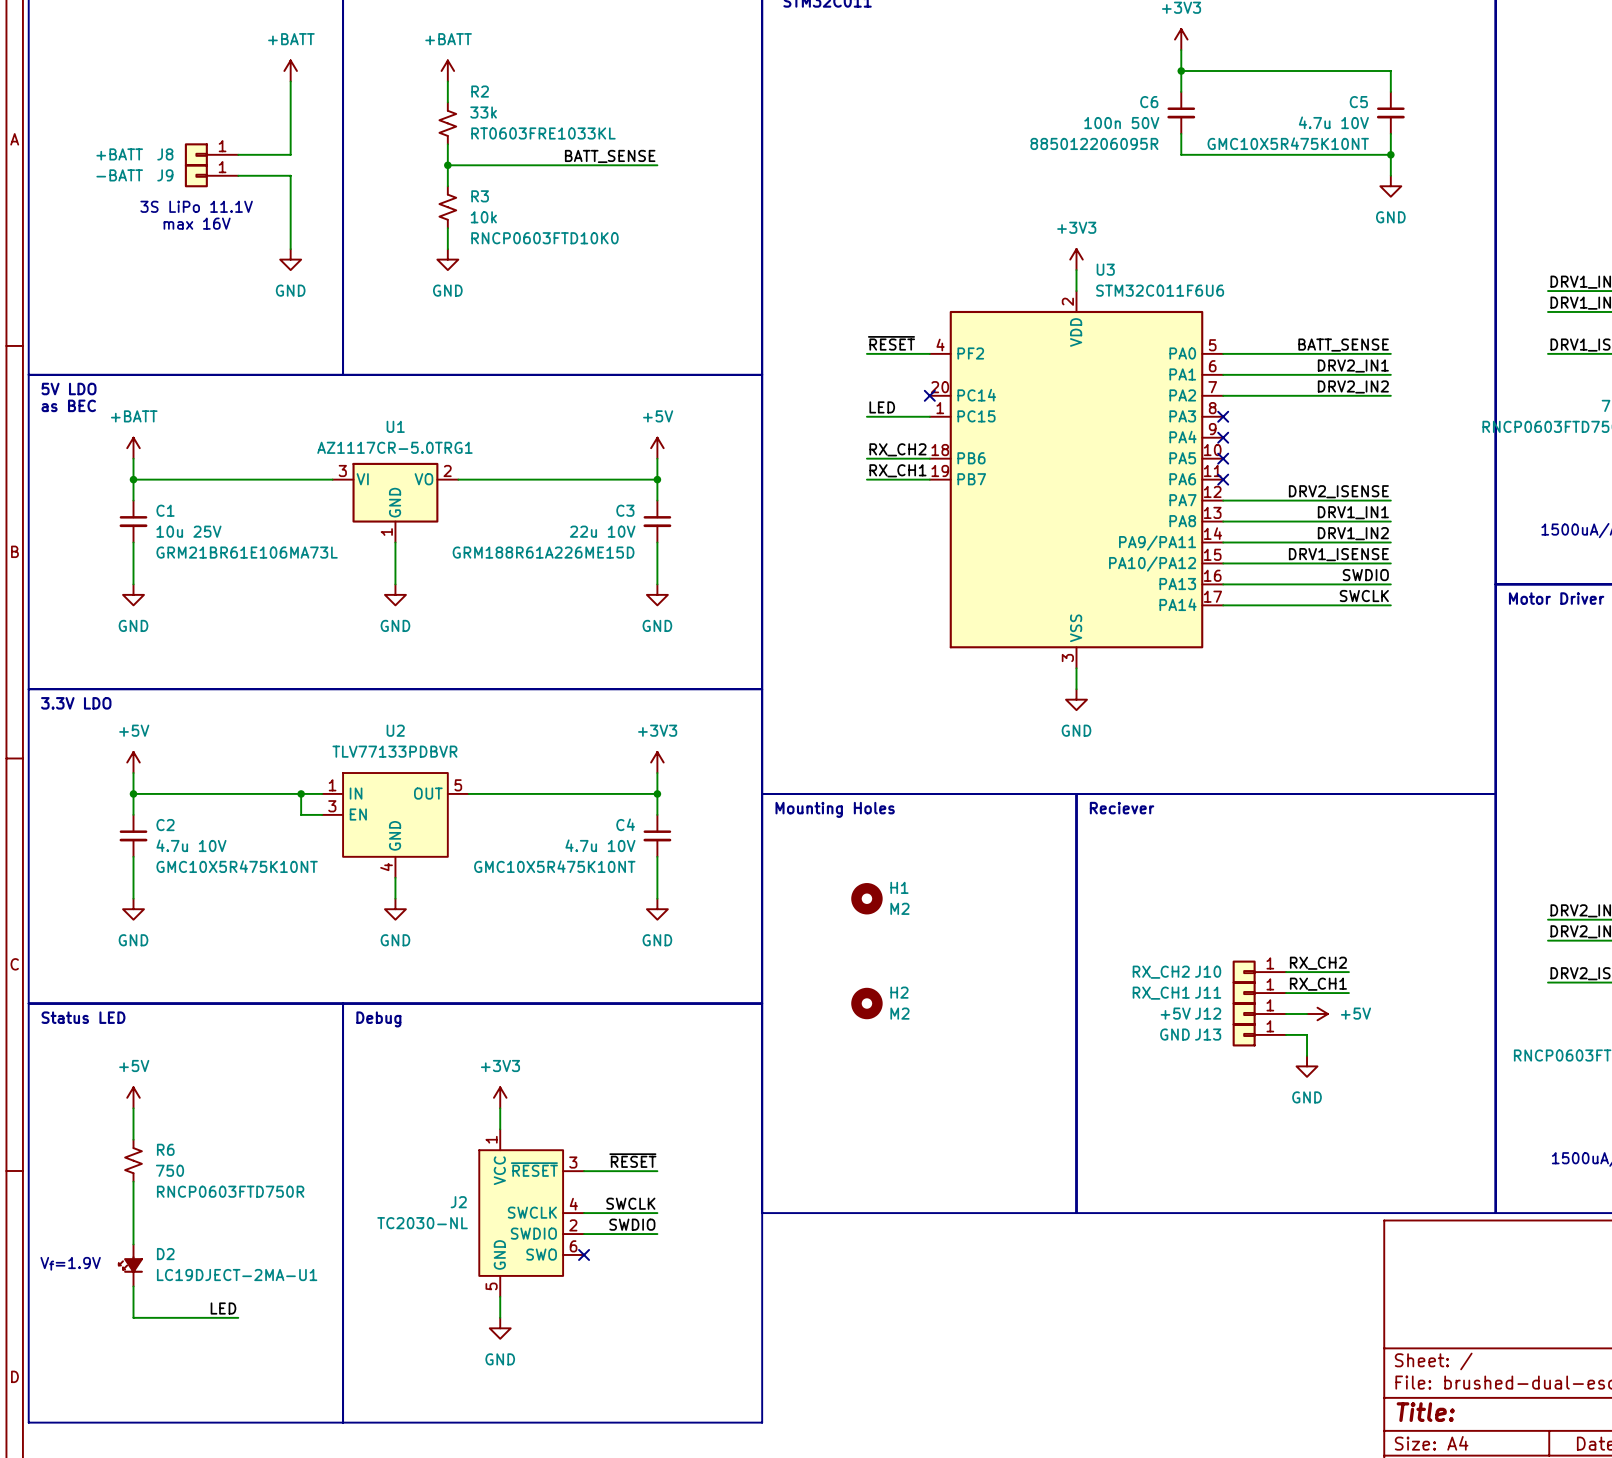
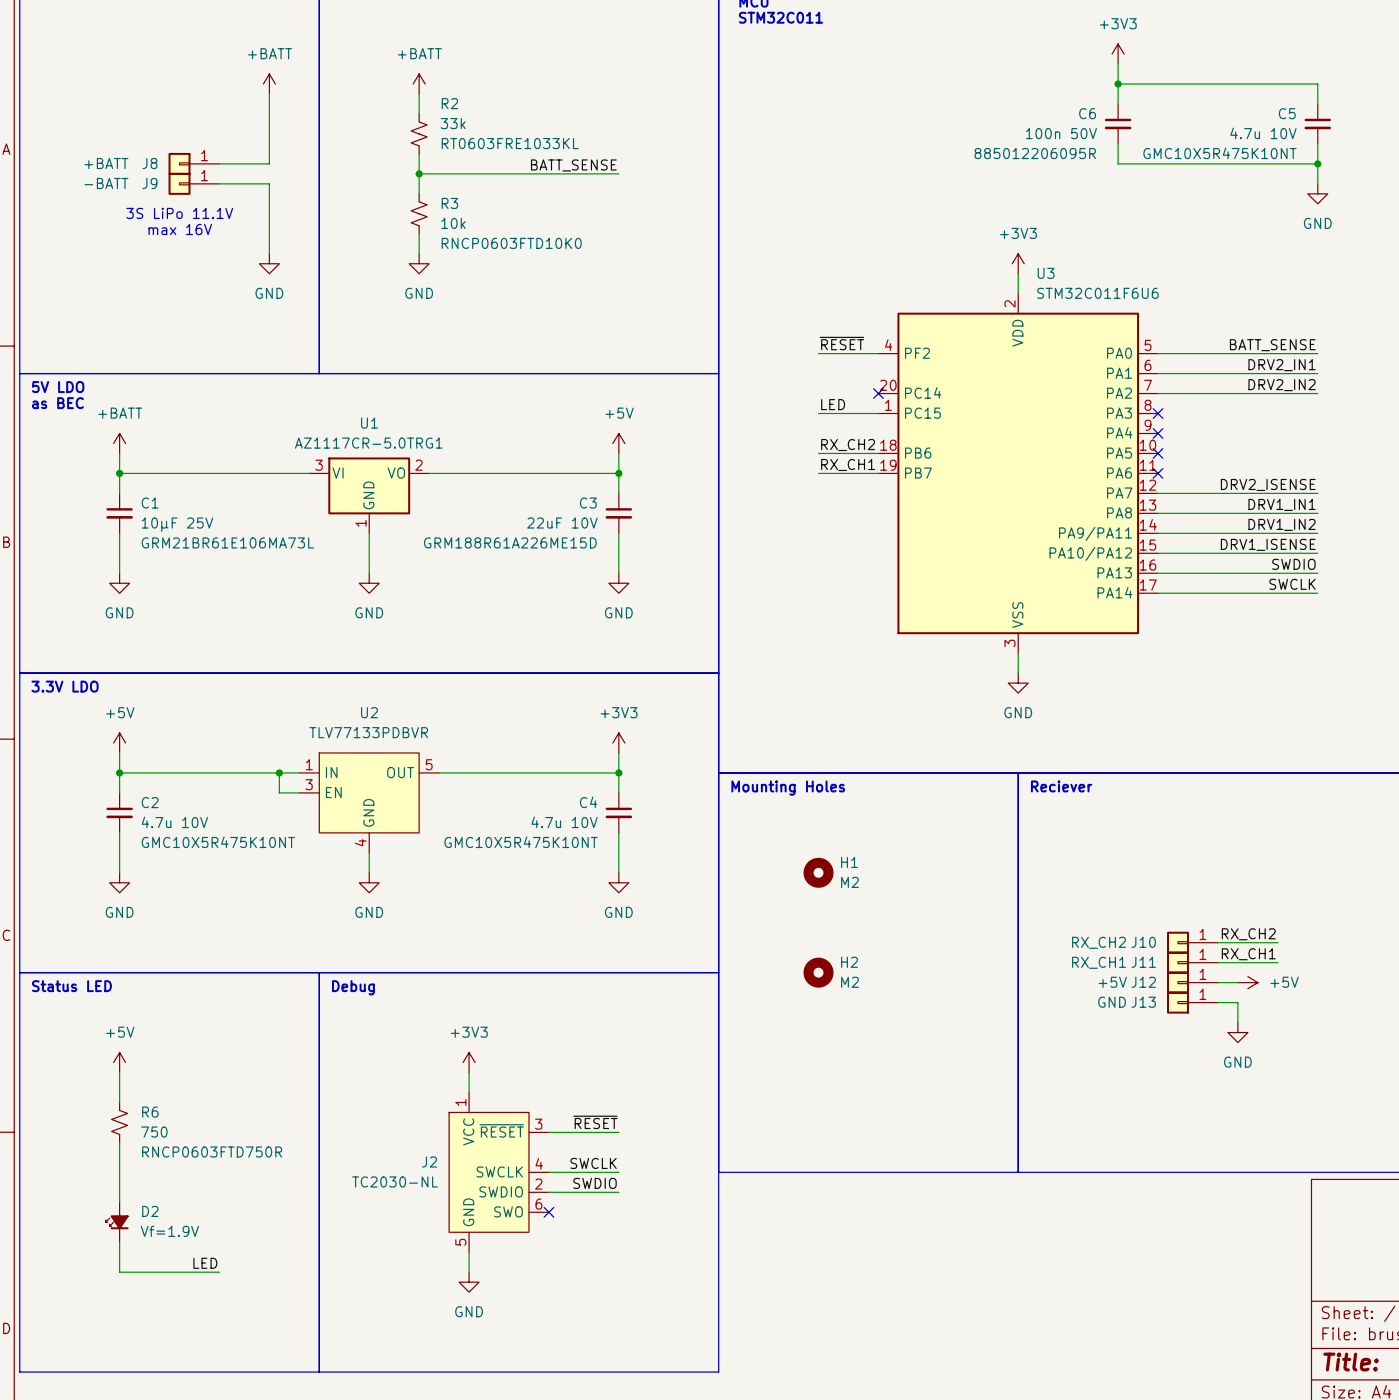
C1 value: 10u 25V (188, 531) -> 10µF 25V (177, 524)
C3 value: 22u 10V (602, 531) -> 22uF 10V (562, 523)
text: Vf=1.9V (70, 1263) -> none
D2 value: LC19DJECT-2MA-U1 (237, 1275) -> Vf=1.9V (169, 1231)

